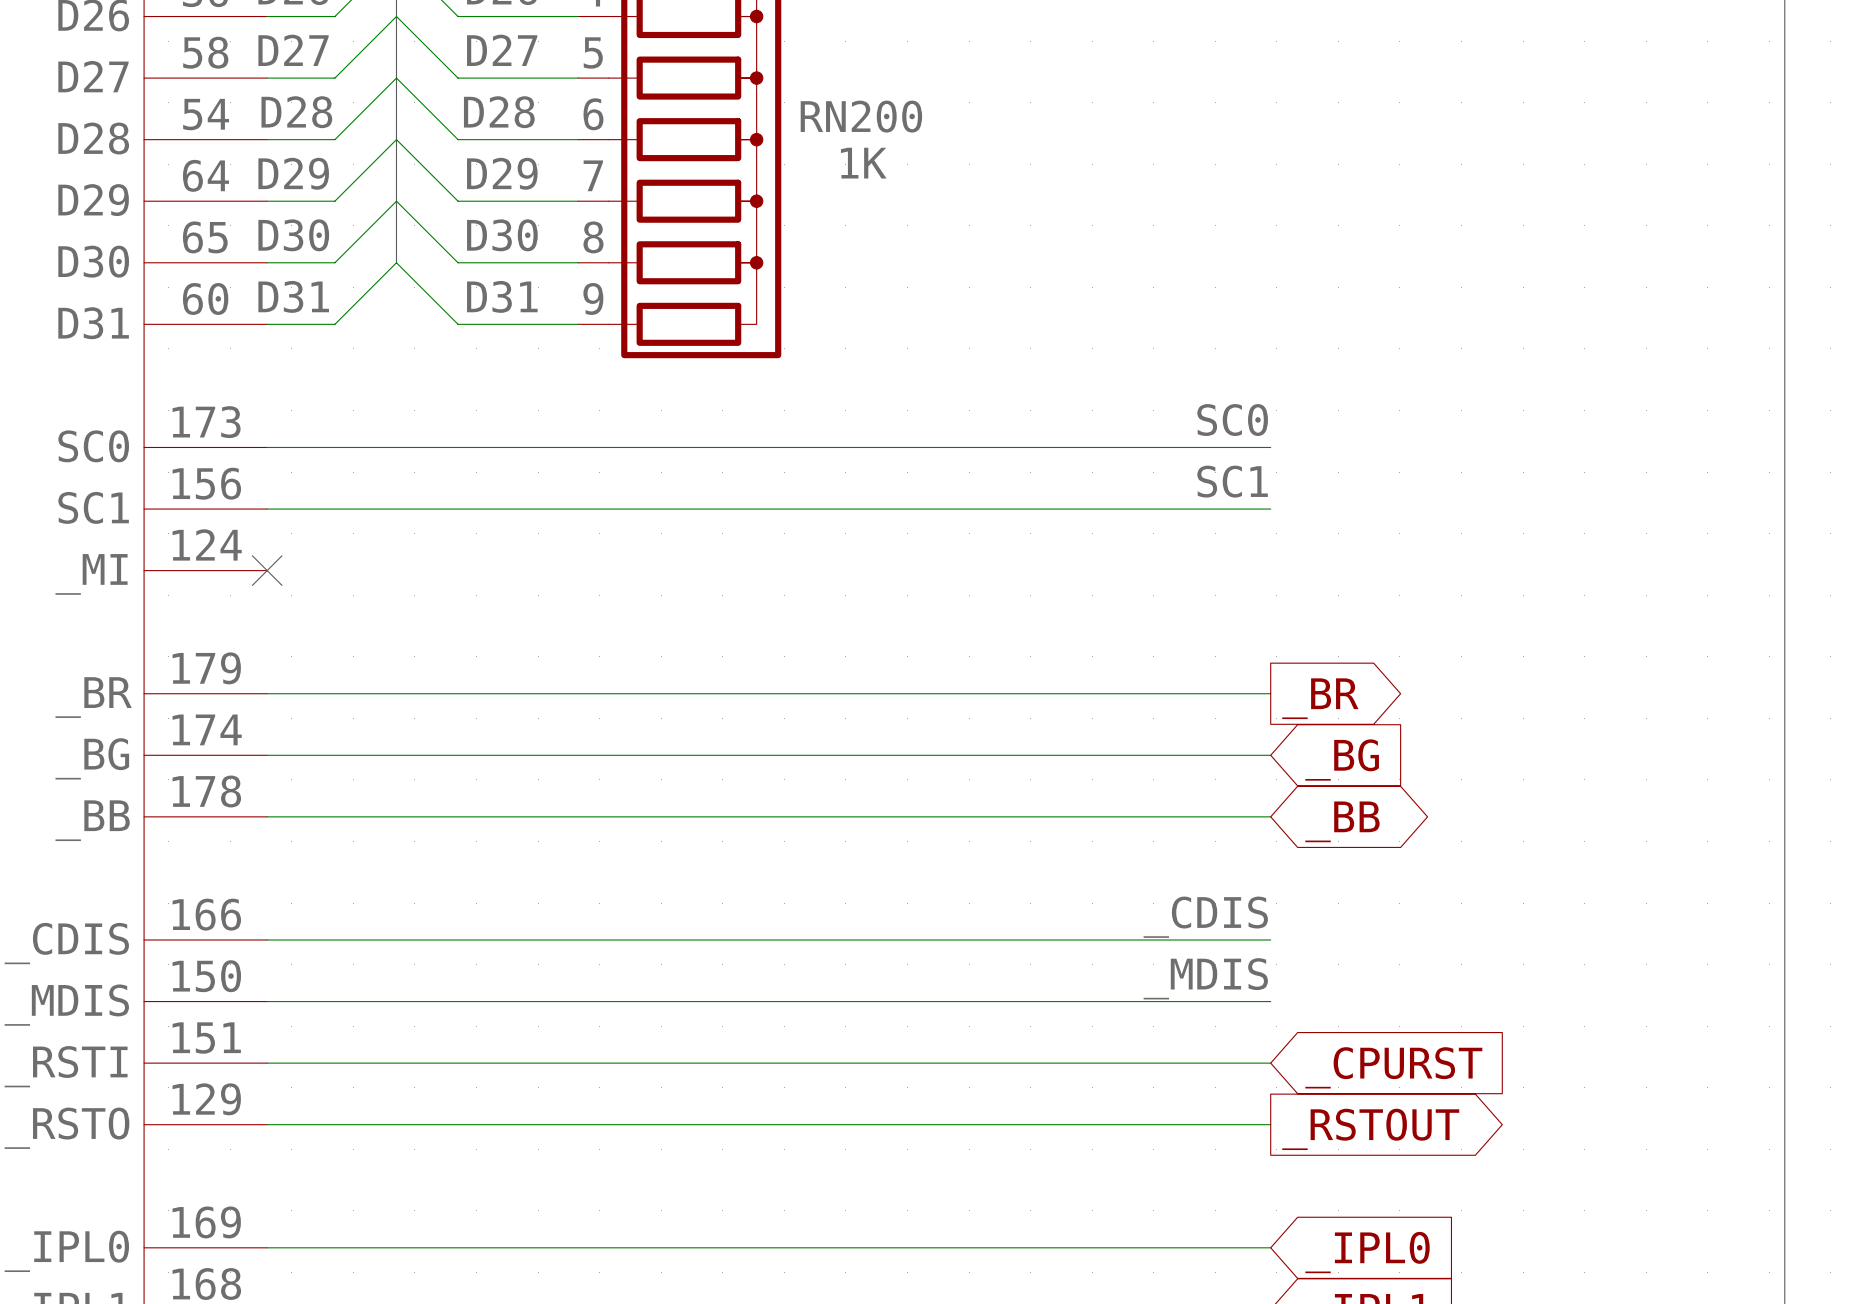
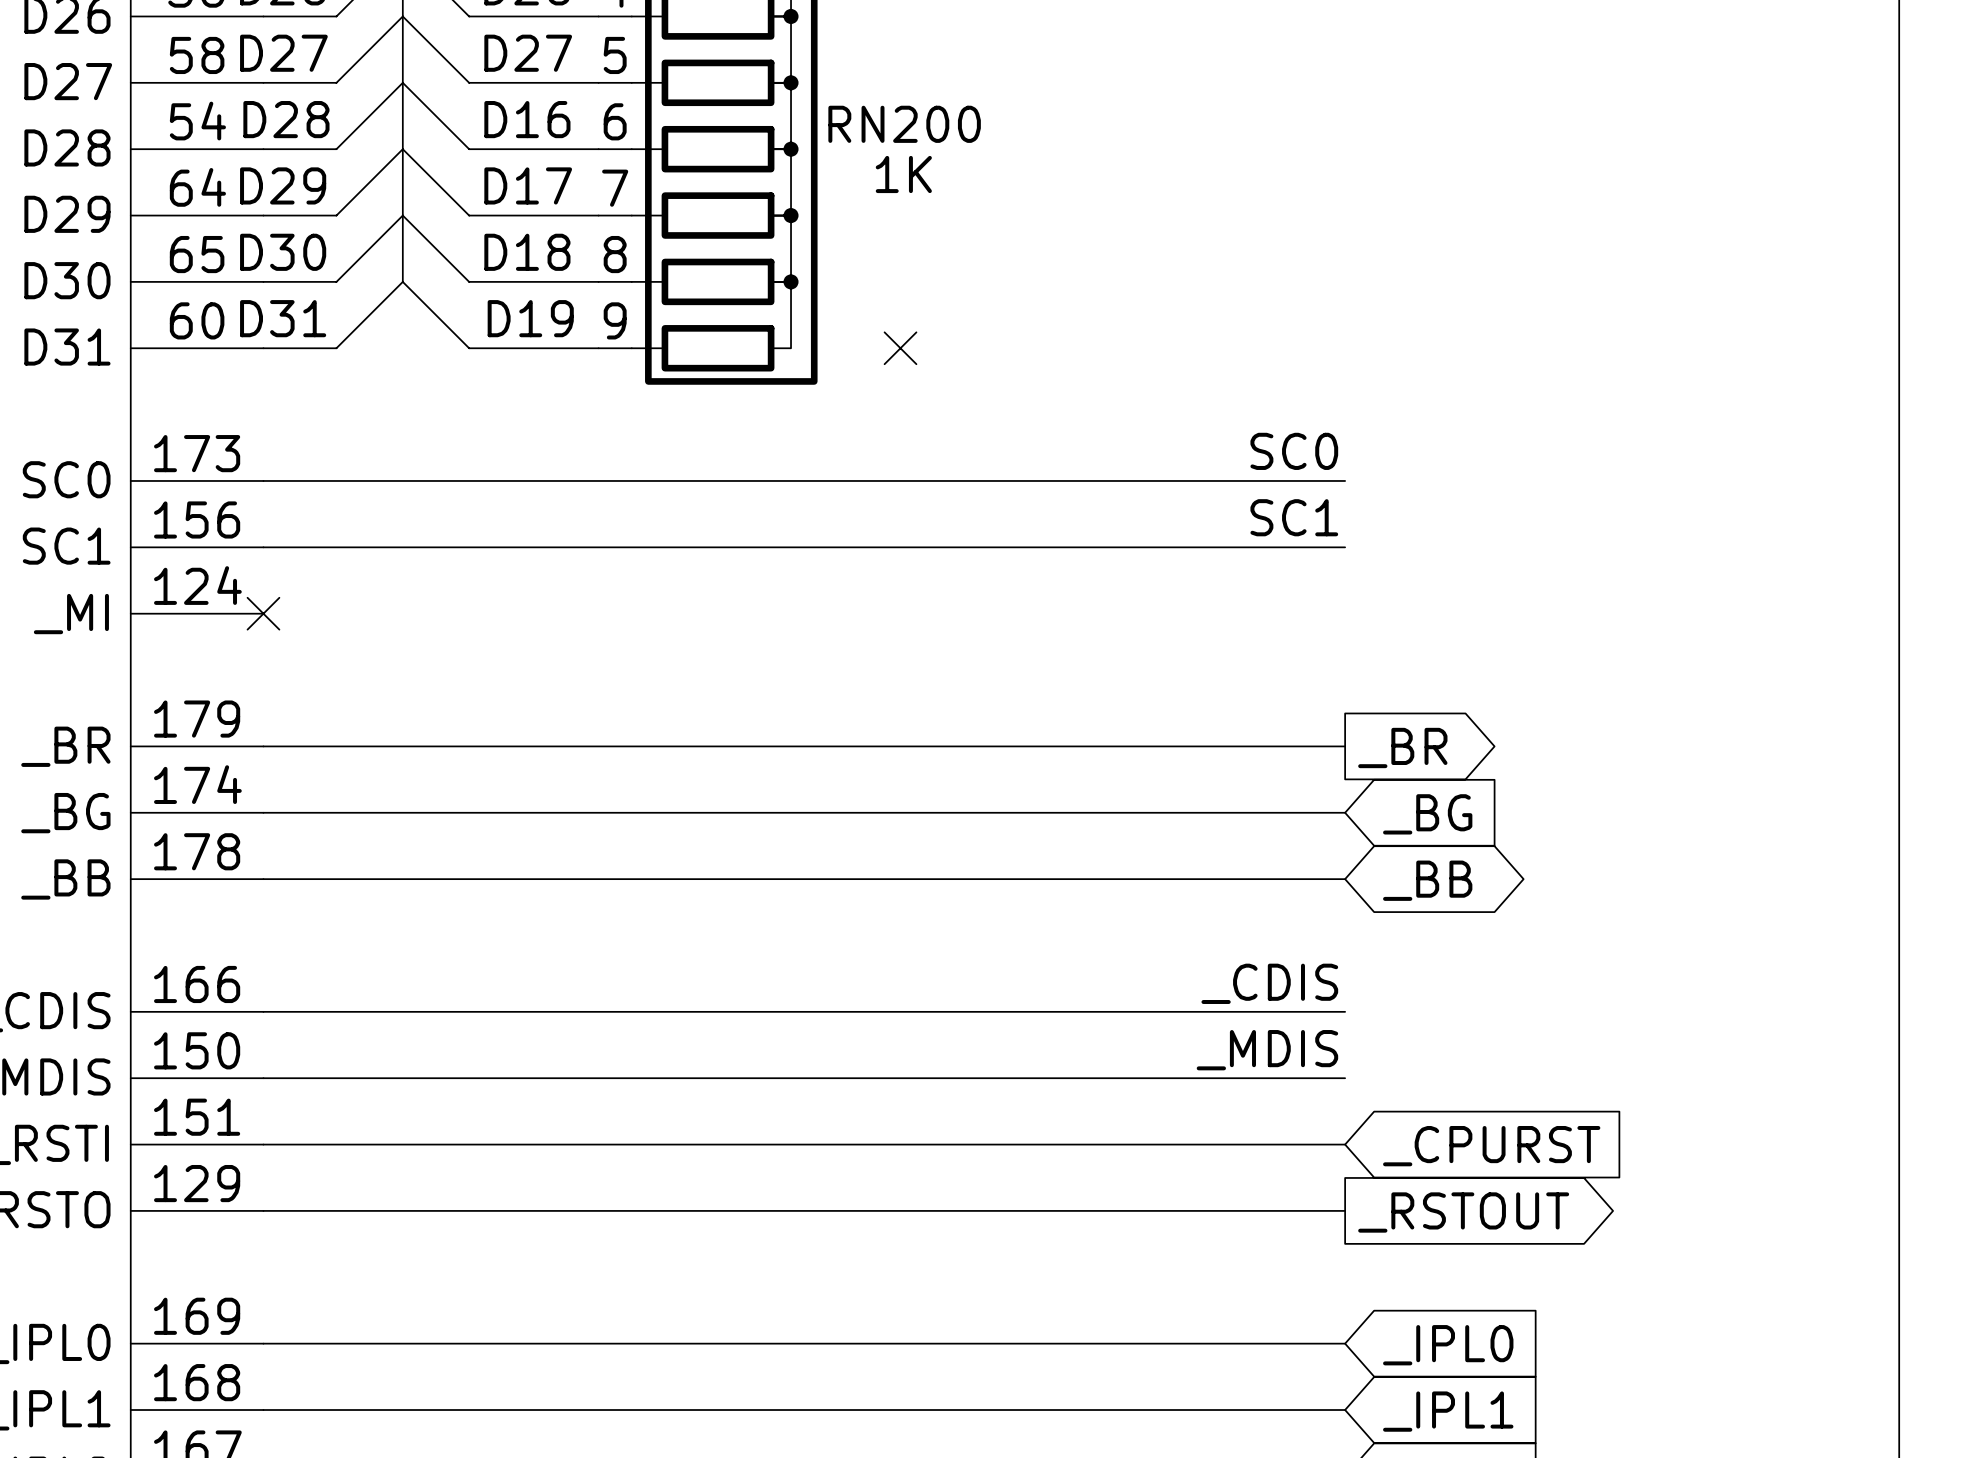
label: D28 (499, 112) -> D16 (527, 119)
label: D29 (502, 173) -> D17 (528, 185)
label: D30 (502, 235) -> D18 (527, 252)
label: D31 (502, 296) -> D19 (530, 318)
no-connect mark: none -> (900, 348)

